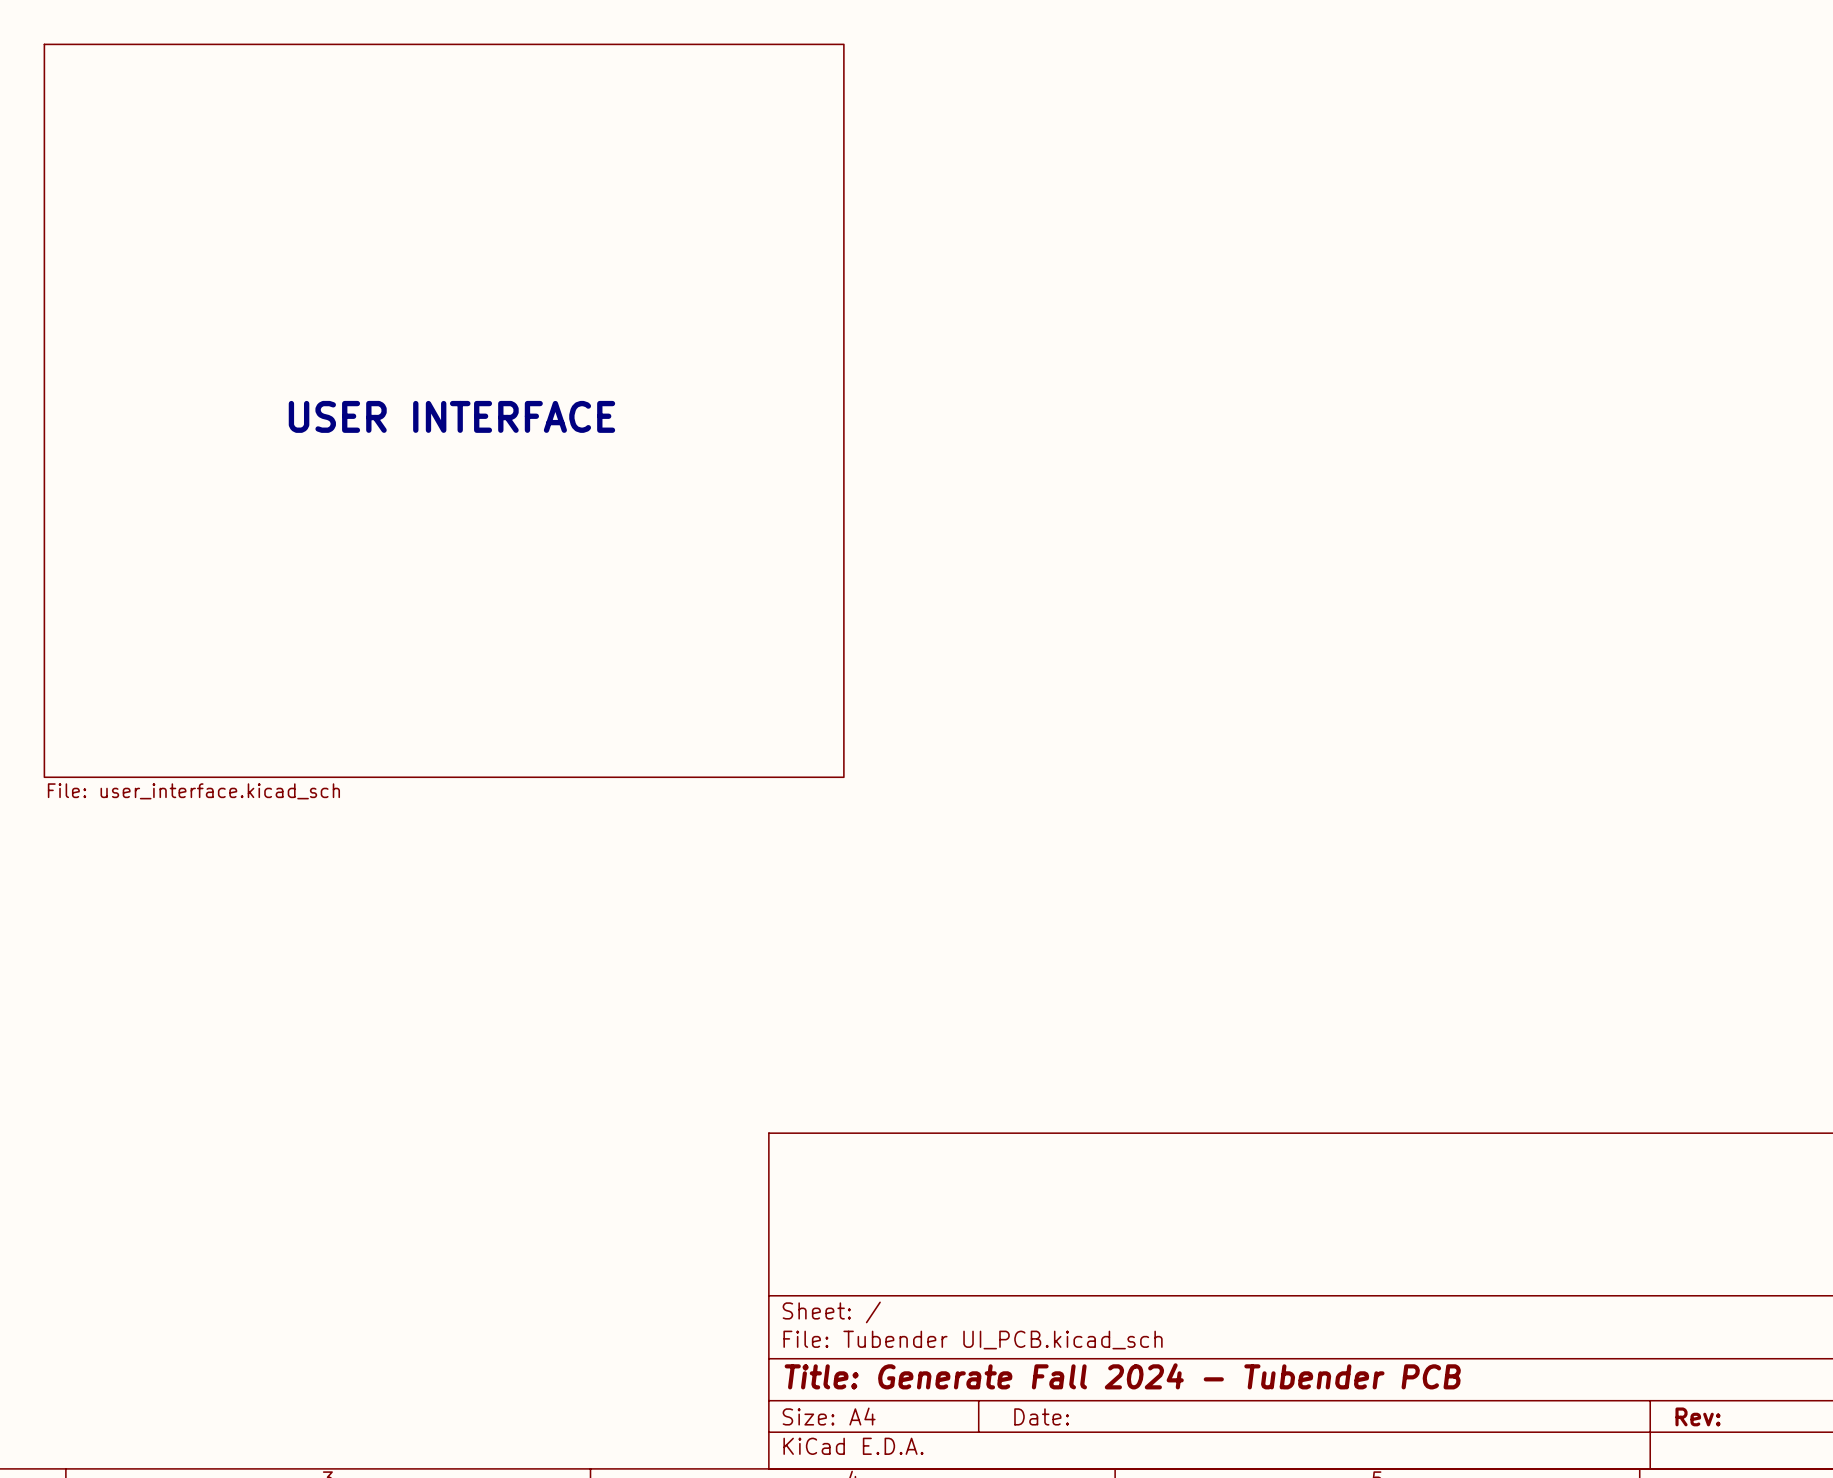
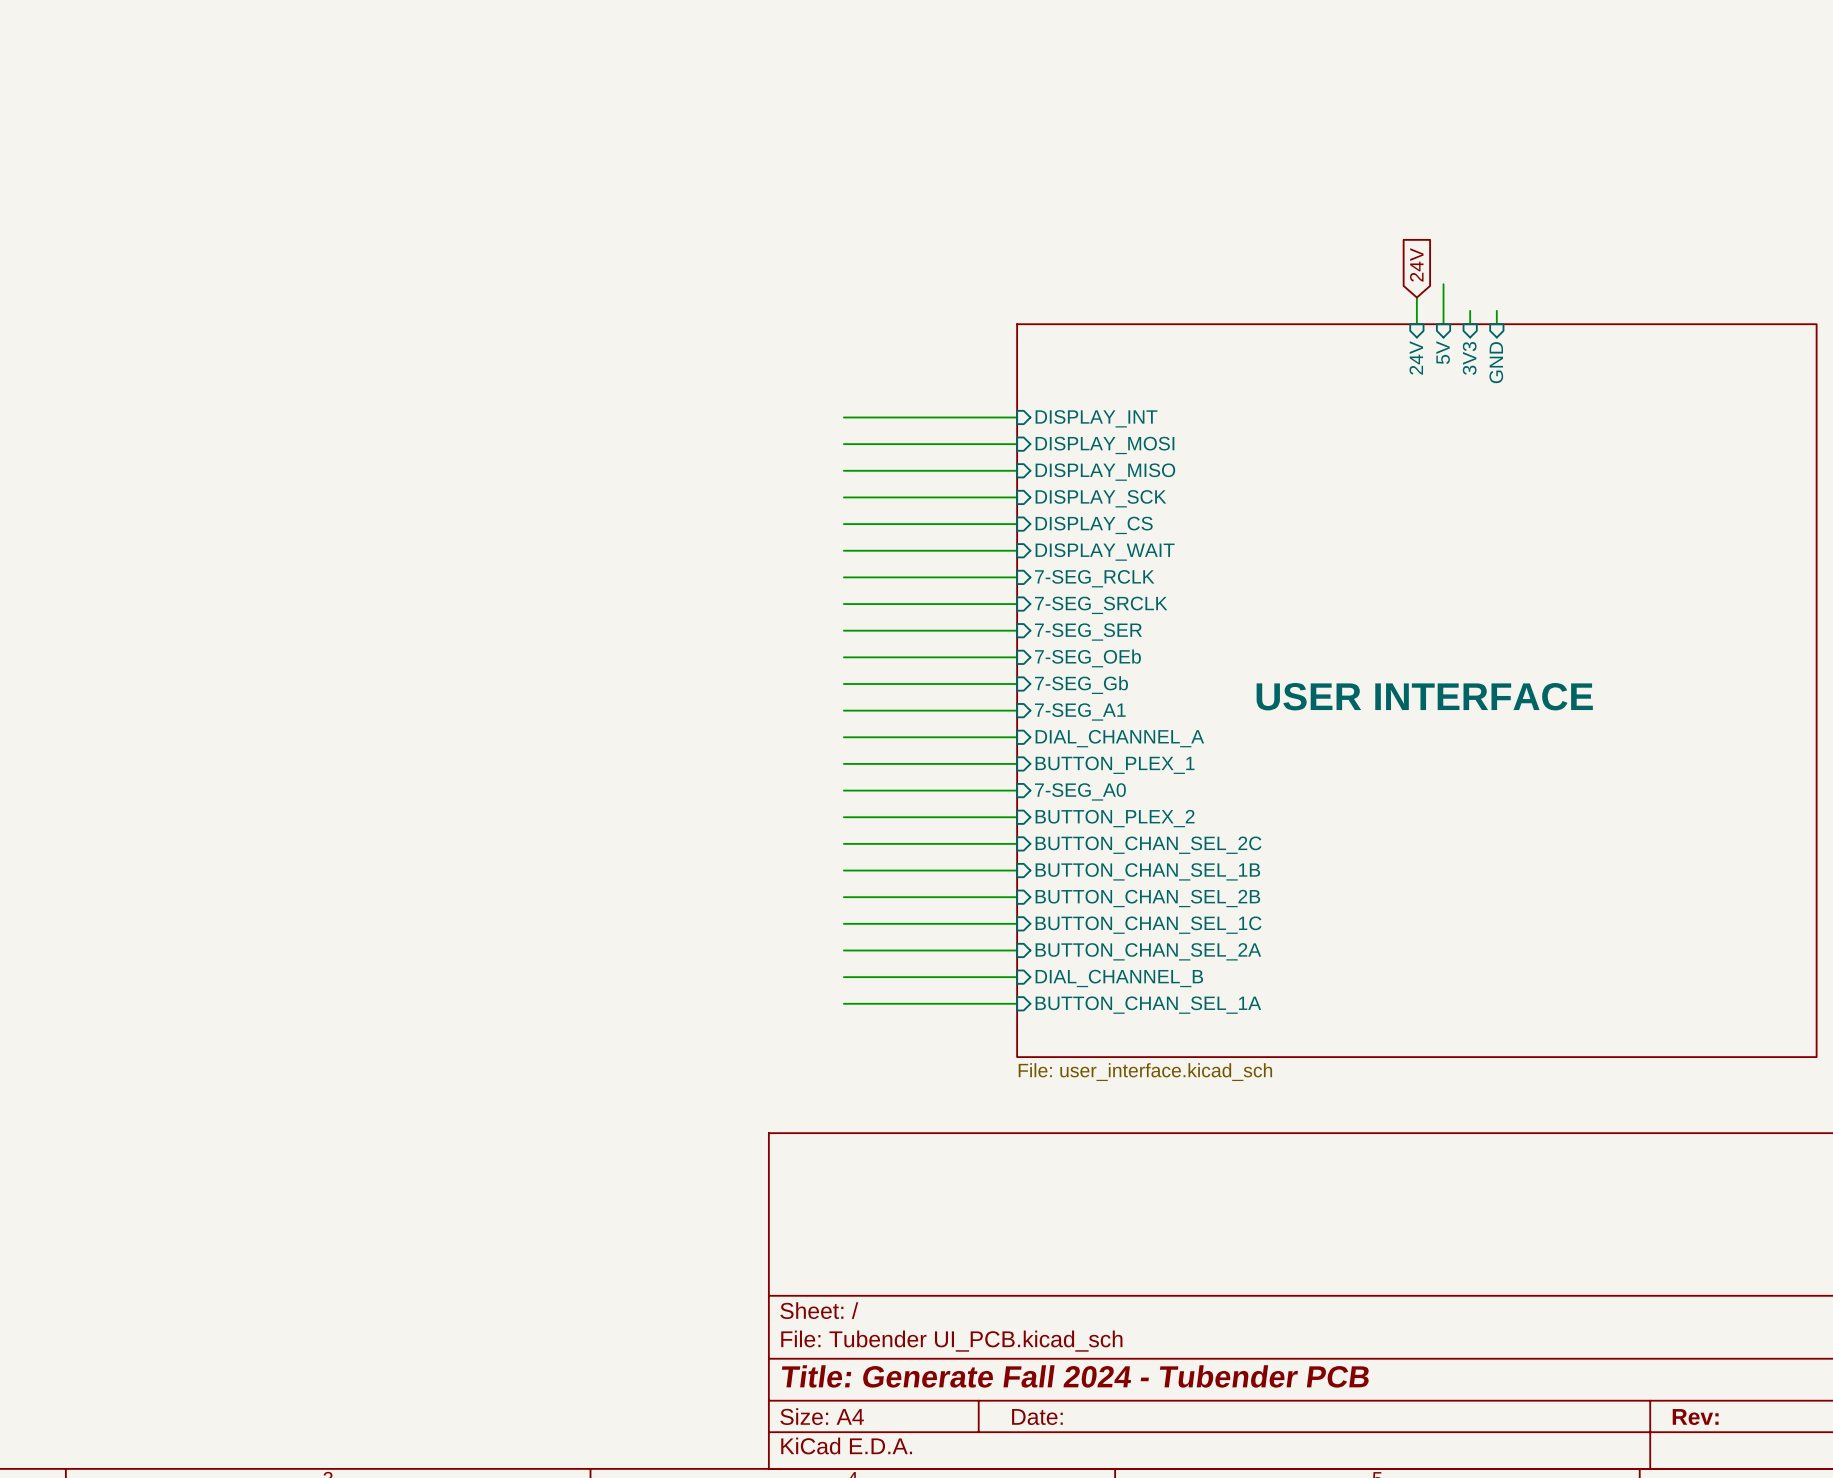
global label: none -> 24V (1416, 264)
wire: none -> (1443, 284) (1443, 324)
wire: none -> (1416, 297) (1416, 324)
wire: none -> (1470, 310) (1470, 324)
wire: none -> (1496, 310) (1496, 324)
sheet pin: none -> 5V (1443, 352)
sheet pin: none -> 24V (1416, 357)
sheet pin: none -> 3V3 (1469, 358)
sheet pin: none -> GND (1496, 362)
sheet USER INTERFACE: File: user_interface.kicad_sch (444, 410) -> none
wire: none -> (843, 417) (1017, 417)
sheet pin: none -> DISPLAY_INT (1096, 418)
wire: none -> (843, 444) (1017, 444)
sheet pin: none -> DISPLAY_MOSI (1104, 445)
wire: none -> (843, 470) (1017, 470)
sheet pin: none -> DISPLAY_MISO (1105, 472)
wire: none -> (843, 497) (1017, 497)
sheet pin: none -> DISPLAY_SCK (1100, 498)
wire: none -> (843, 524) (1017, 524)
sheet pin: none -> DISPLAY_CS (1094, 525)
wire: none -> (843, 550) (1017, 550)
sheet pin: none -> DISPLAY_WAIT (1105, 552)
wire: none -> (843, 577) (1017, 577)
sheet pin: none -> 7-SEG_RCLK (1094, 578)
wire: none -> (843, 604) (1017, 604)
sheet pin: none -> 7-SEG_SRCLK (1101, 605)
wire: none -> (843, 630) (1017, 630)
sheet pin: none -> 7-SEG_SER (1088, 632)
wire: none -> (843, 657) (1017, 657)
sheet pin: none -> 7-SEG_OEb (1087, 658)
wire: none -> (843, 683) (1017, 683)
sheet pin: none -> 7-SEG_Gb (1081, 685)
sheet USER INTERFACE: none -> File: user_interface.kicad_sch (1416, 690)
wire: none -> (843, 710) (1017, 710)
sheet pin: none -> 7-SEG_A1 (1080, 711)
wire: none -> (843, 737) (1017, 737)
sheet pin: none -> DIAL_CHANNEL_A (1119, 738)
wire: none -> (843, 763) (1017, 763)
sheet pin: none -> BUTTON_PLEX_1 (1115, 765)
wire: none -> (843, 790) (1017, 790)
sheet pin: none -> 7-SEG_A0 (1080, 791)
wire: none -> (843, 817) (1017, 817)
sheet pin: none -> BUTTON_PLEX_2 (1115, 818)
wire: none -> (843, 843) (1017, 843)
sheet pin: none -> BUTTON_CHAN_SEL_2C (1148, 845)
wire: none -> (843, 870) (1017, 870)
sheet pin: none -> BUTTON_CHAN_SEL_1B (1147, 871)
wire: none -> (843, 897) (1017, 897)
sheet pin: none -> BUTTON_CHAN_SEL_2B (1147, 898)
wire: none -> (843, 923) (1017, 923)
sheet pin: none -> BUTTON_CHAN_SEL_1C (1148, 925)
wire: none -> (843, 950) (1017, 950)
sheet pin: none -> BUTTON_CHAN_SEL_2A (1148, 951)
wire: none -> (843, 977) (1017, 977)
sheet pin: none -> DIAL_CHANNEL_B (1119, 978)
wire: none -> (843, 1003) (1017, 1003)
sheet pin: none -> BUTTON_CHAN_SEL_1A (1148, 1005)

